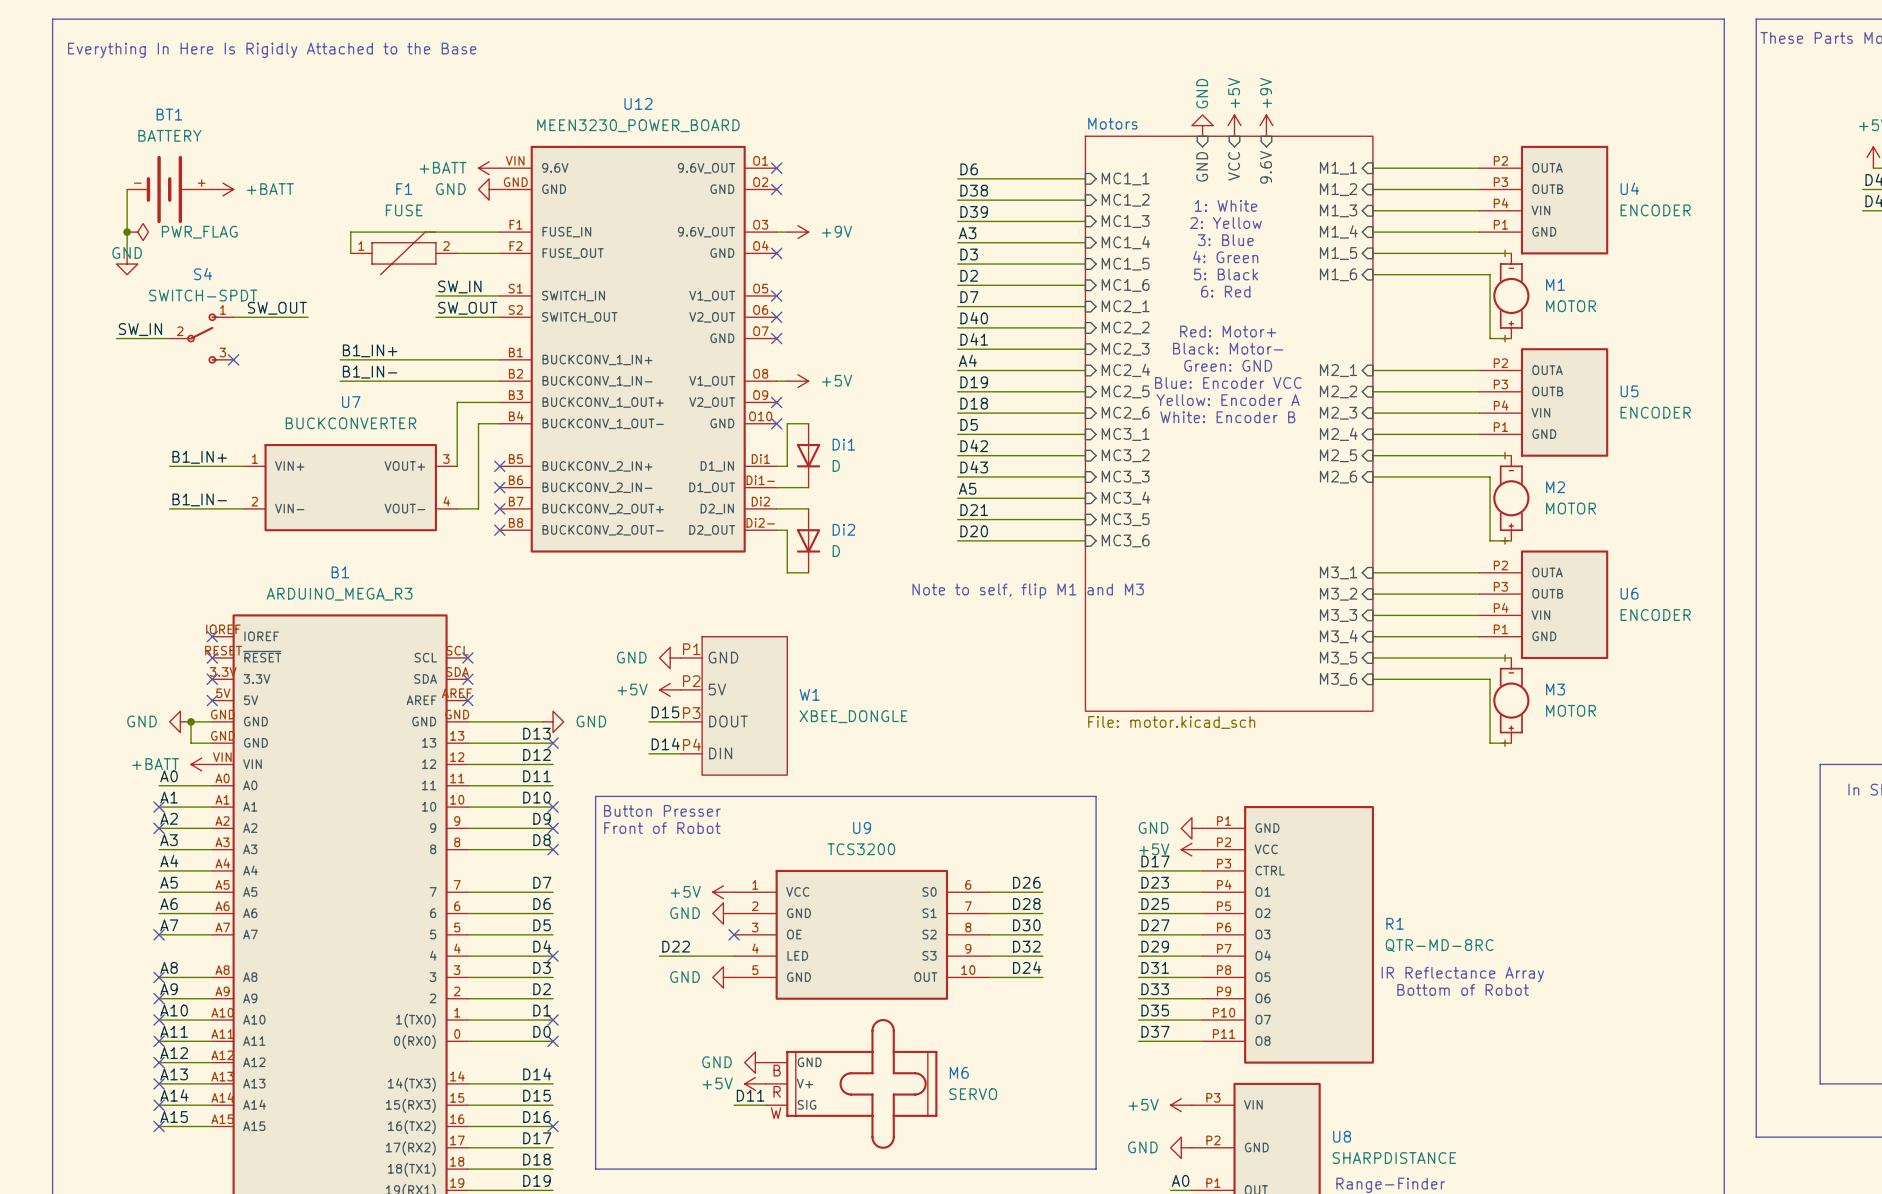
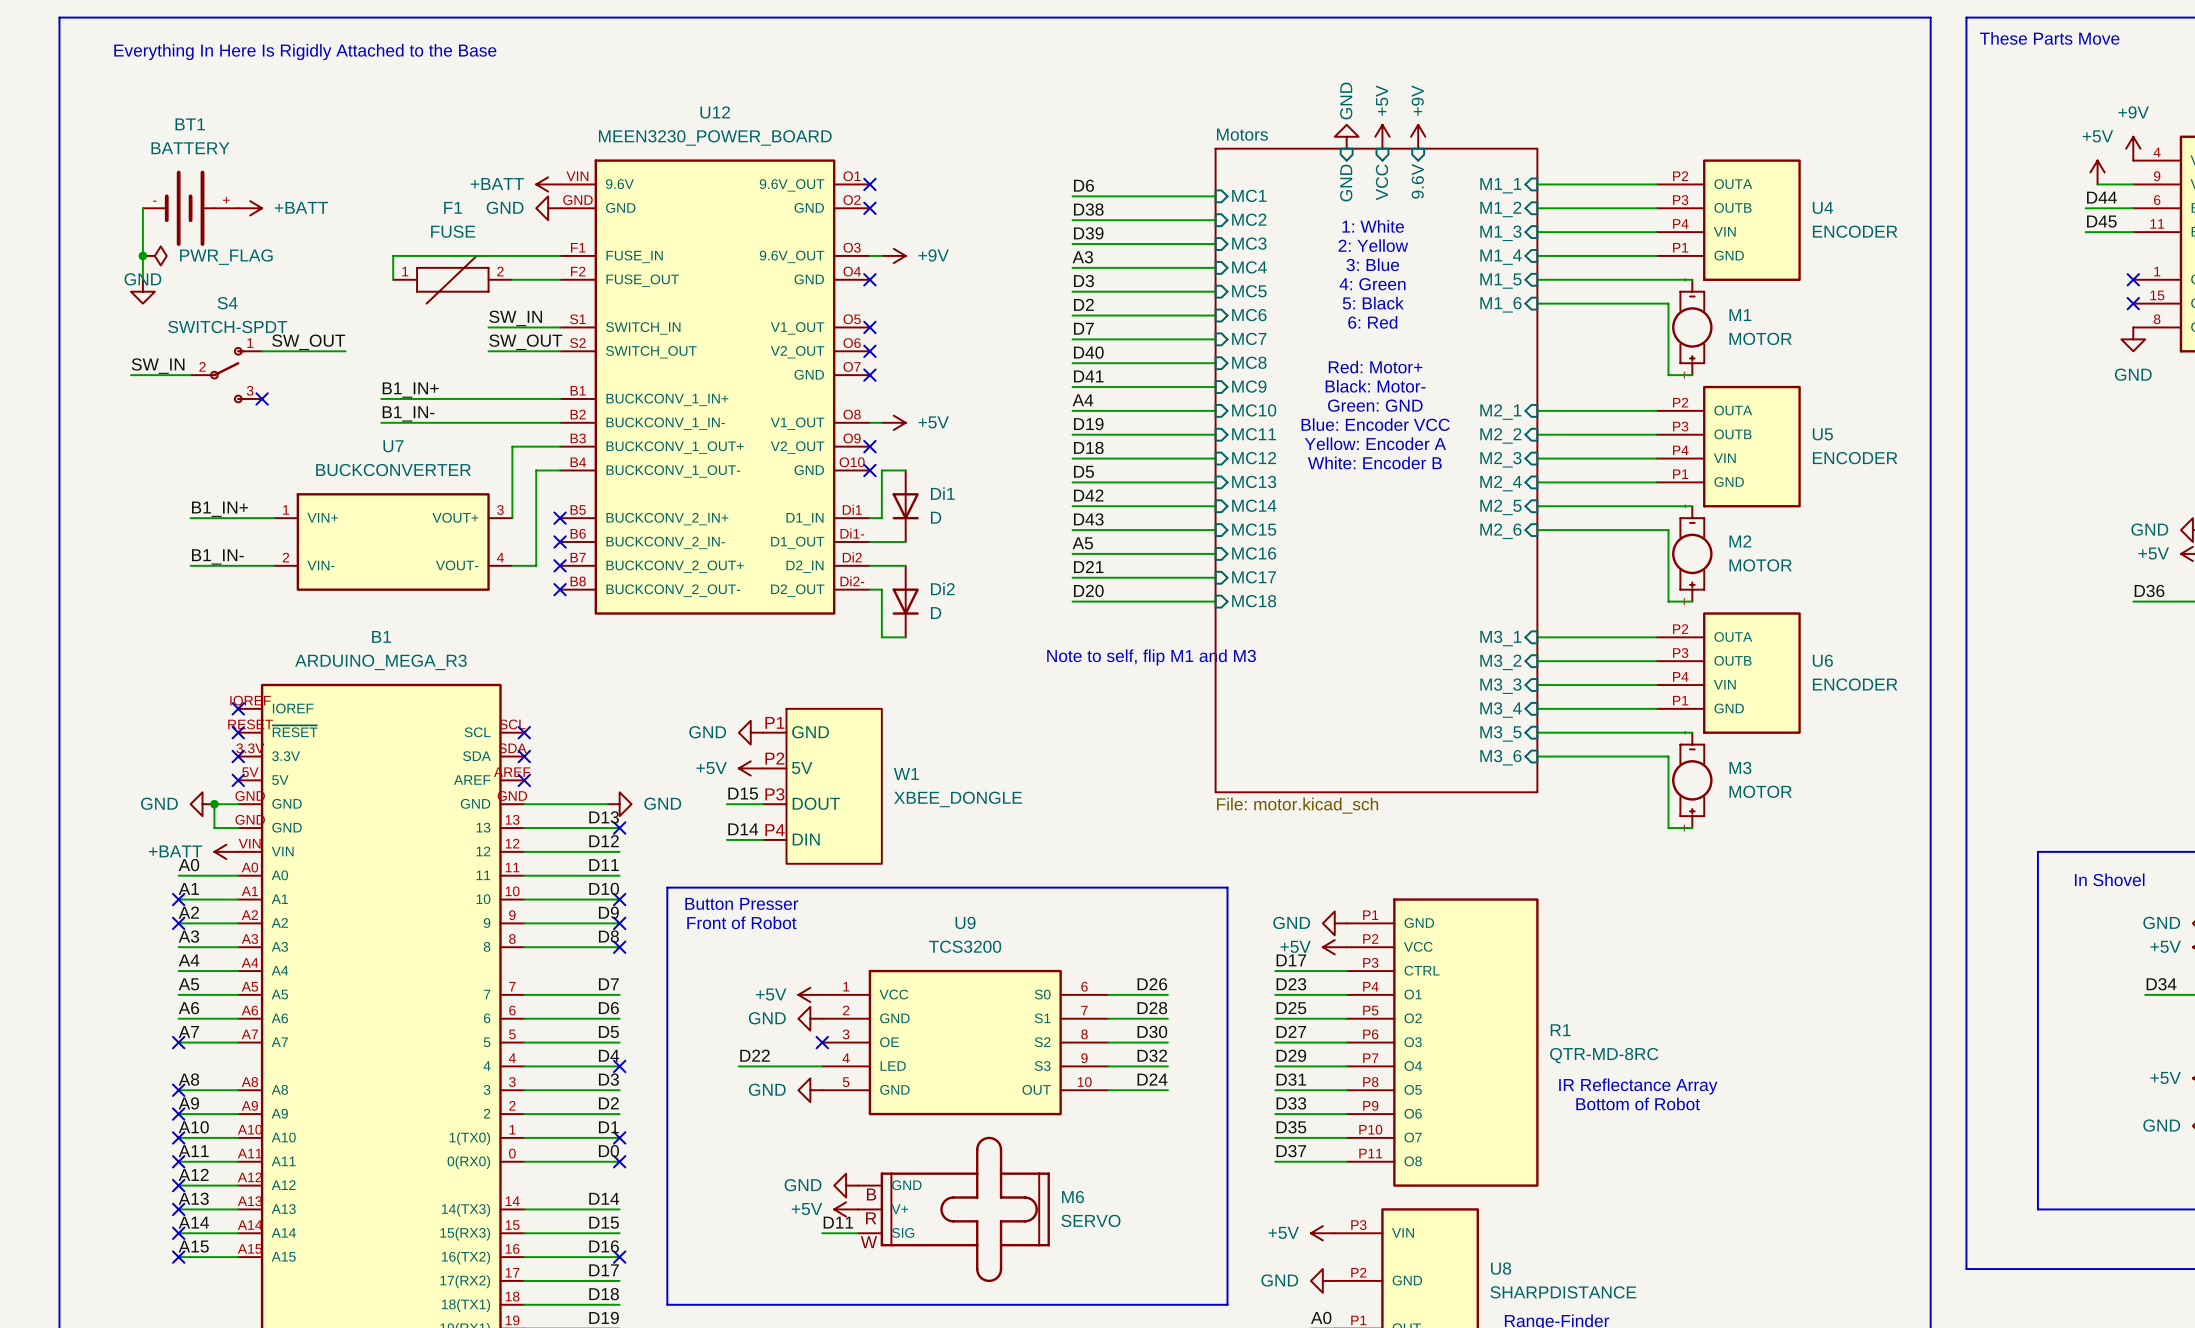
sheet pin: MC1_1 (1125, 178) -> MC1 (1249, 195)
sheet pin: MC1_2 (1125, 200) -> MC2 (1249, 219)
sheet pin: MC1_3 (1125, 221) -> MC3 (1249, 243)
sheet pin: MC1_4 (1125, 242) -> MC4 (1249, 267)
sheet pin: MC1_5 (1125, 264) -> MC5 (1249, 291)
sheet pin: MC1_6 (1125, 285) -> MC6 (1249, 315)
sheet pin: MC2_1 (1125, 306) -> MC7 (1249, 338)
sheet pin: MC2_2 (1125, 328) -> MC8 (1249, 362)
sheet pin: MC2_3 (1125, 349) -> MC9 (1249, 386)
sheet pin: MC2_4 (1125, 370) -> MC10 (1254, 410)
sheet pin: MC2_5 (1125, 391) -> MC11 (1254, 434)
sheet pin: MC2_6 (1125, 413) -> MC12 (1254, 458)
sheet pin: MC3_1 (1125, 434) -> MC13 (1254, 481)
sheet pin: MC3_2 (1125, 455) -> MC14 (1254, 505)
sheet pin: MC3_3 (1125, 477) -> MC15 (1254, 529)
sheet pin: MC3_4 (1125, 498) -> MC16 (1254, 553)
sheet pin: MC3_5 (1125, 519) -> MC17 (1254, 577)
sheet pin: MC3_6 (1125, 540) -> MC18 (1254, 601)

